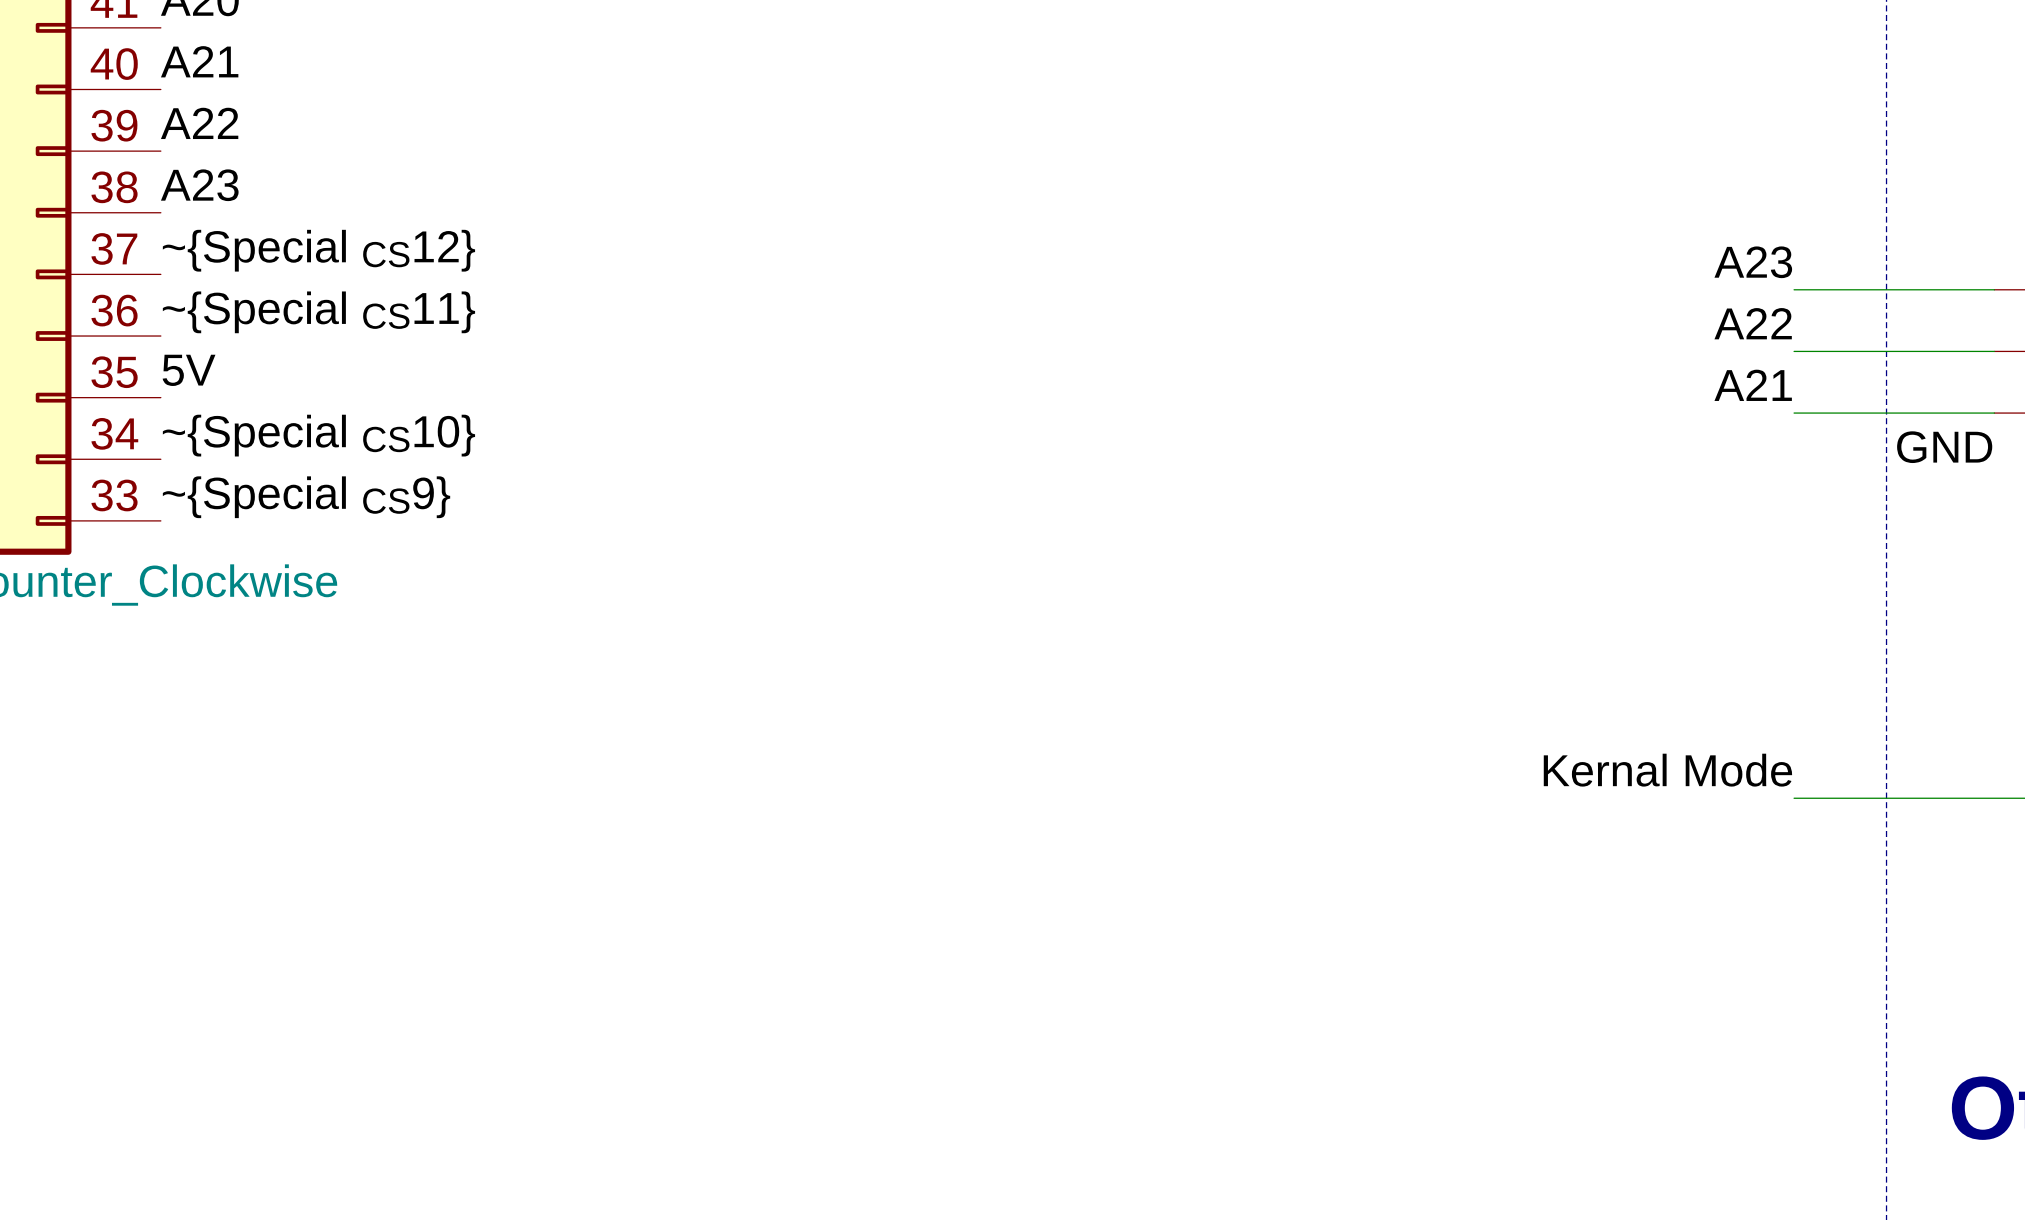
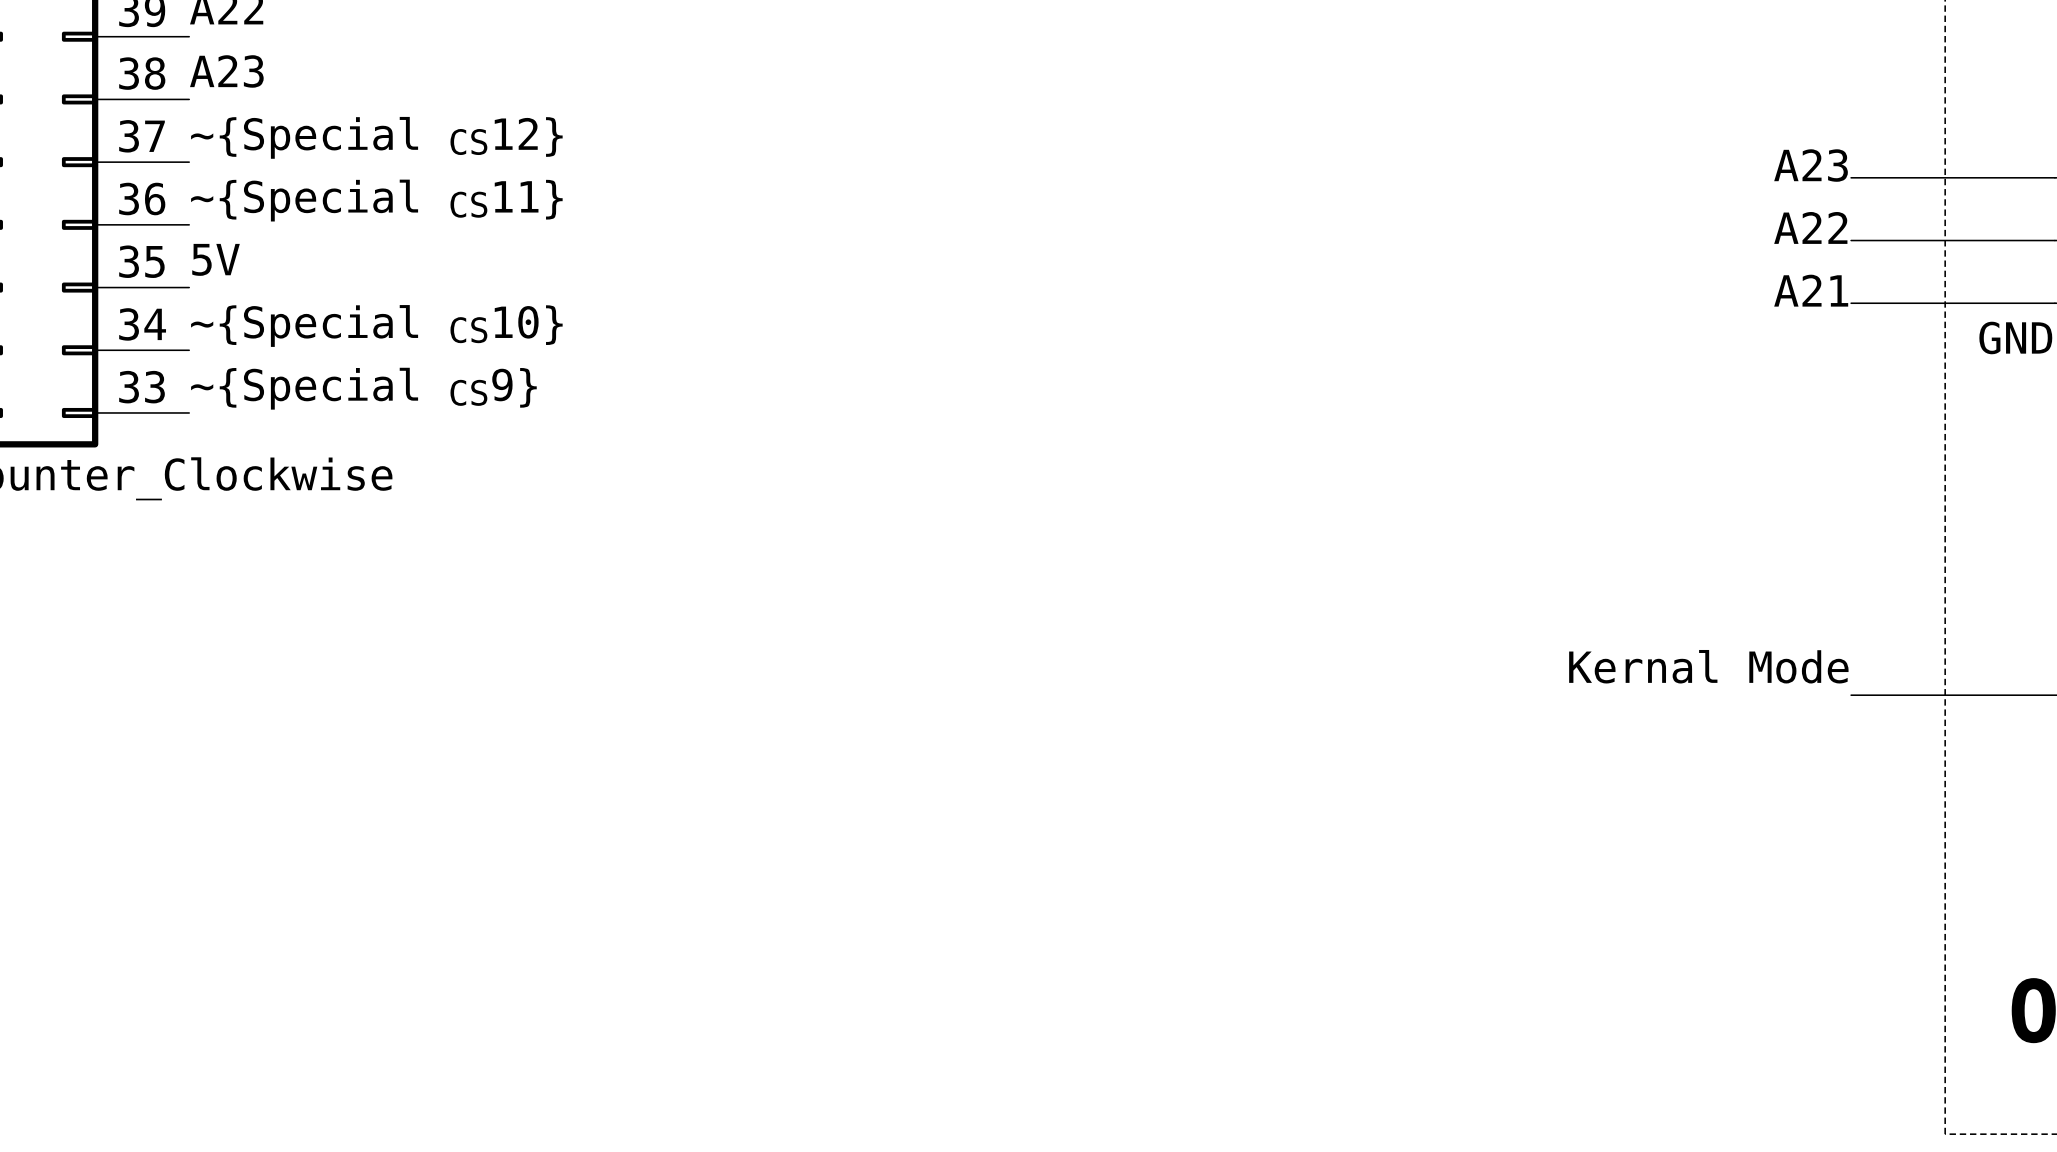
label position: A23 (1753, 262) -> A23 (1811, 165)
label position: A22 (1753, 323) -> A22 (1810, 227)
label position: A21 (1753, 385) -> A21 (1811, 290)

